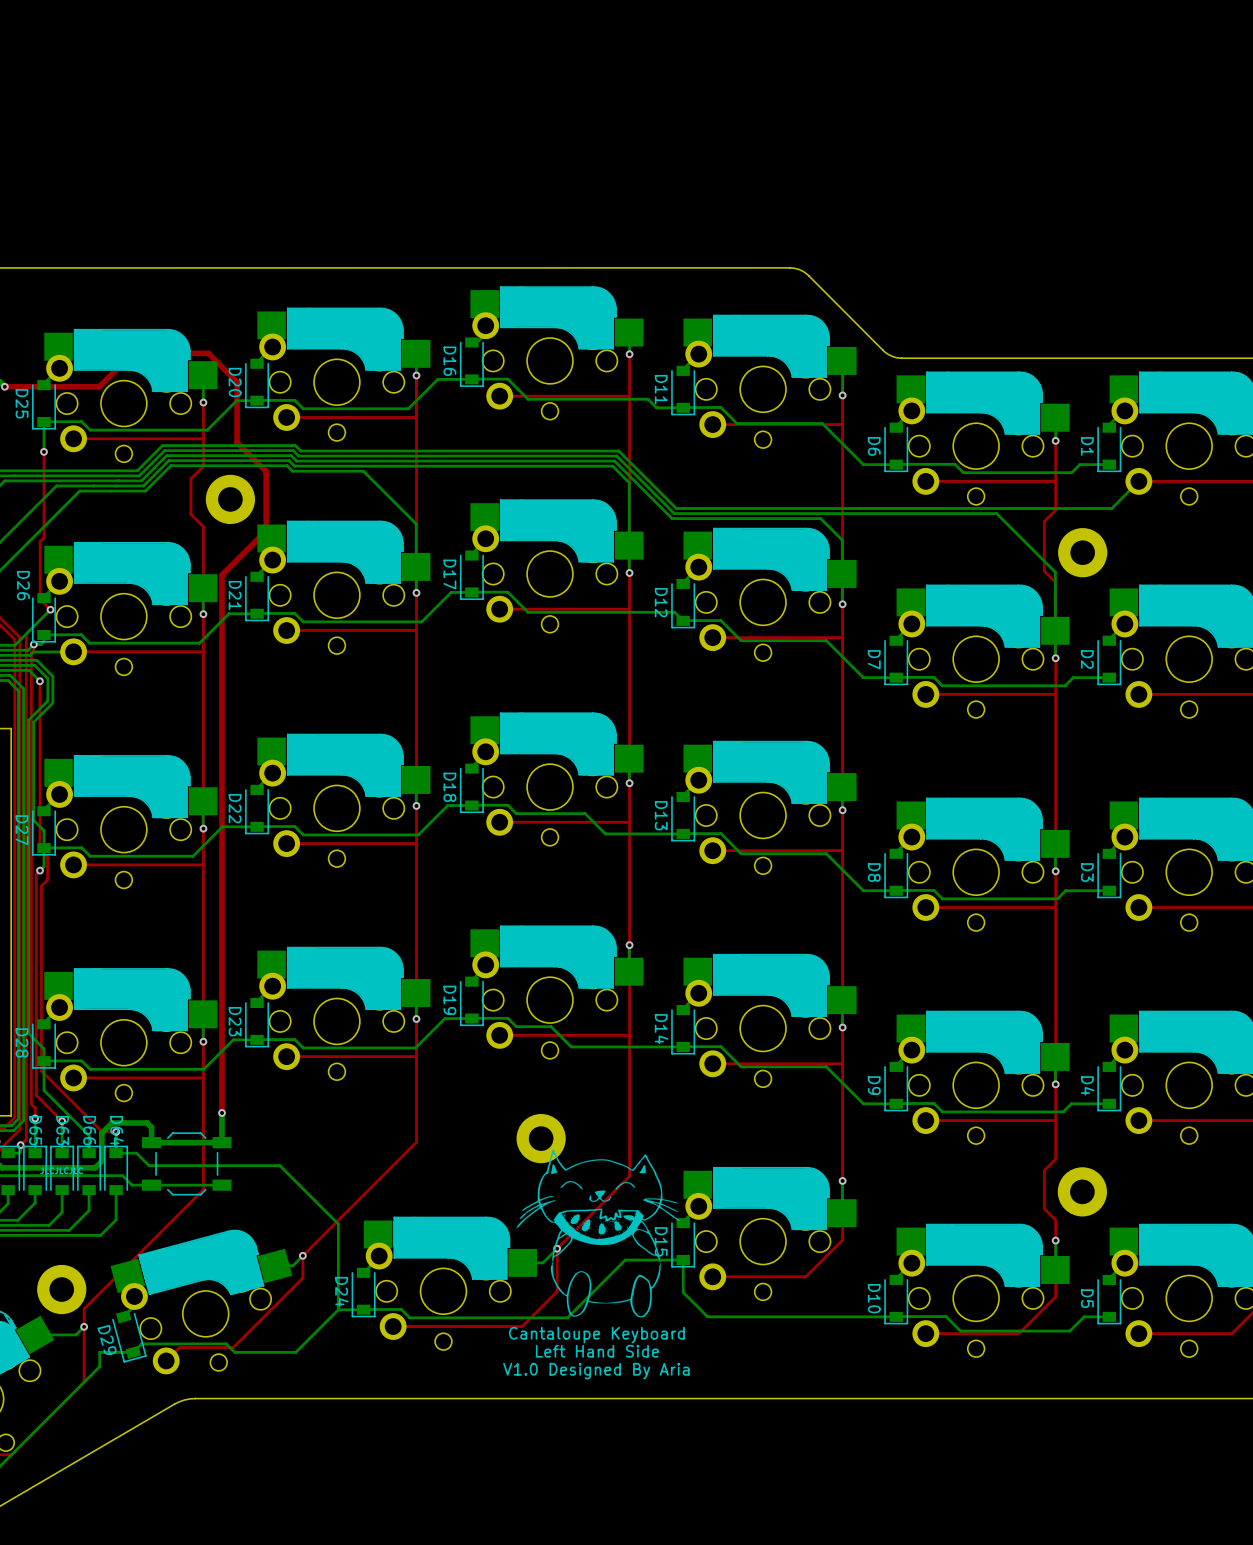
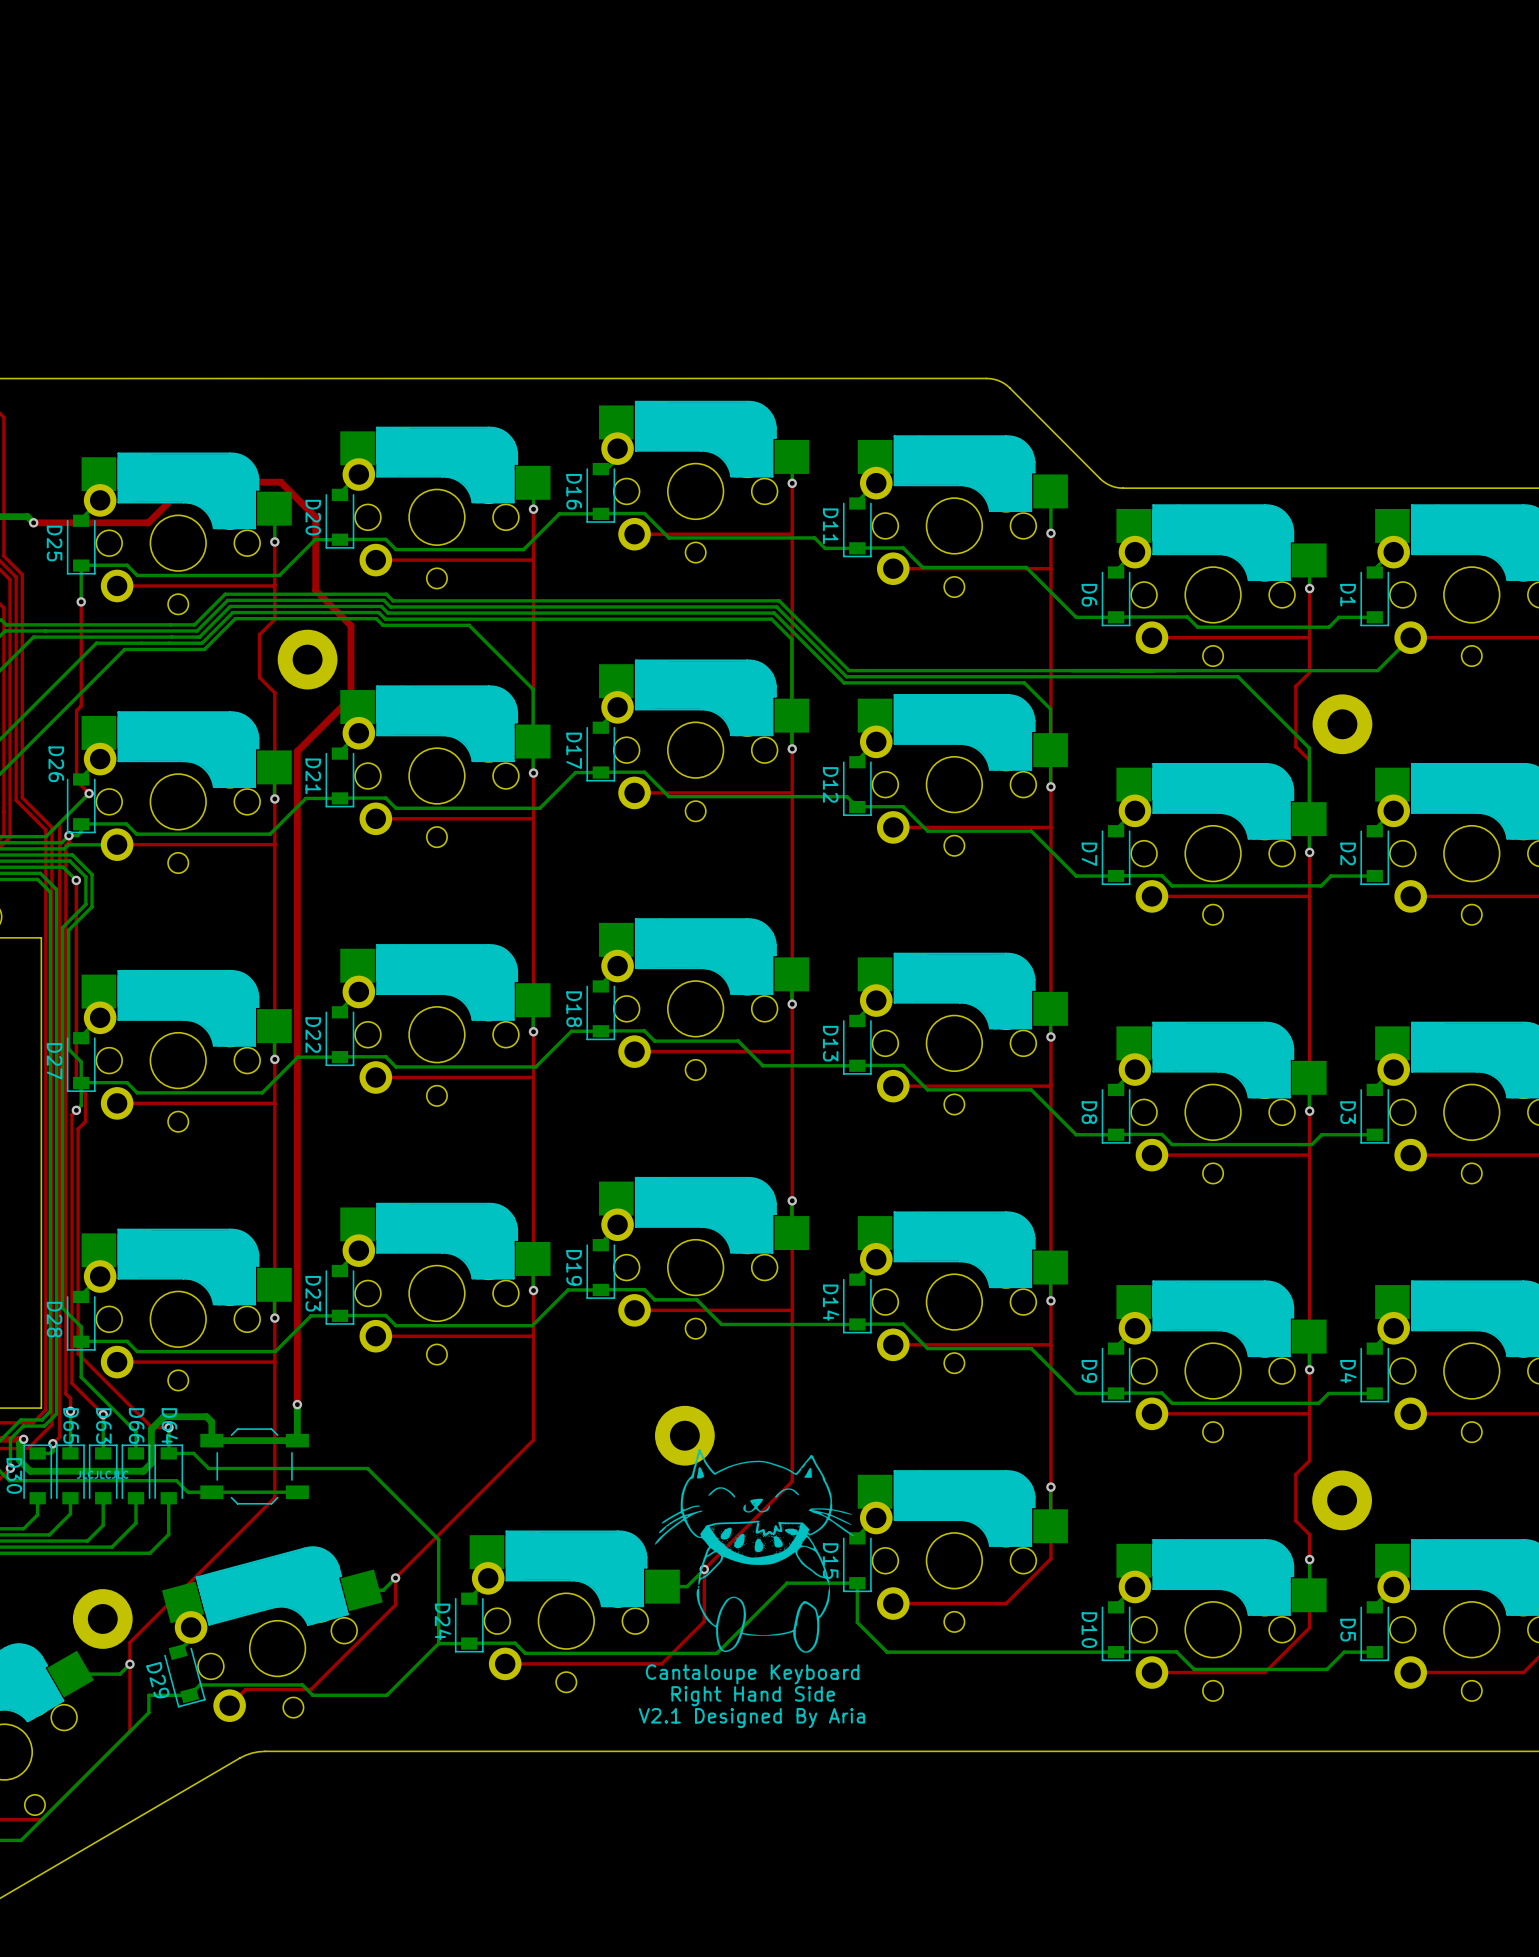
text: Left Hand Side (597, 1351) -> Right Hand Side (753, 1696)
text: V1.0 Designed By Aria (596, 1371) -> V2.1 Designed By Aria (751, 1718)

